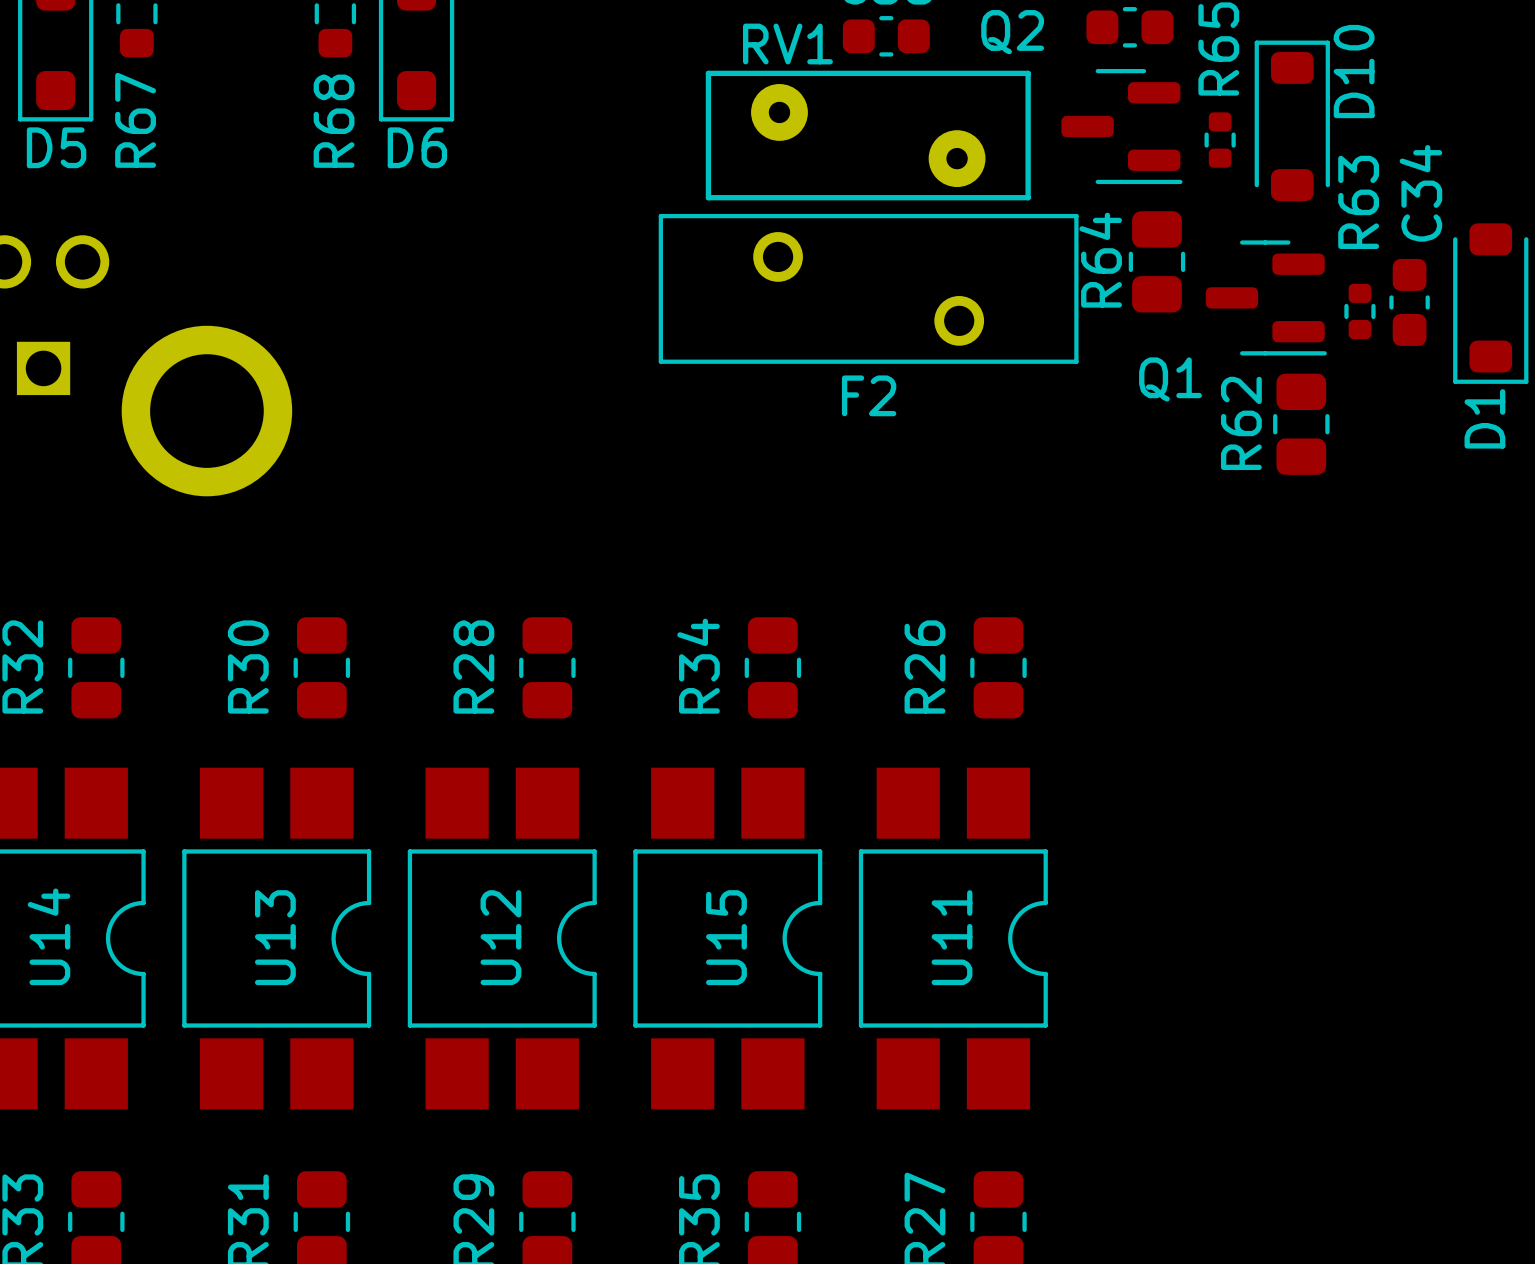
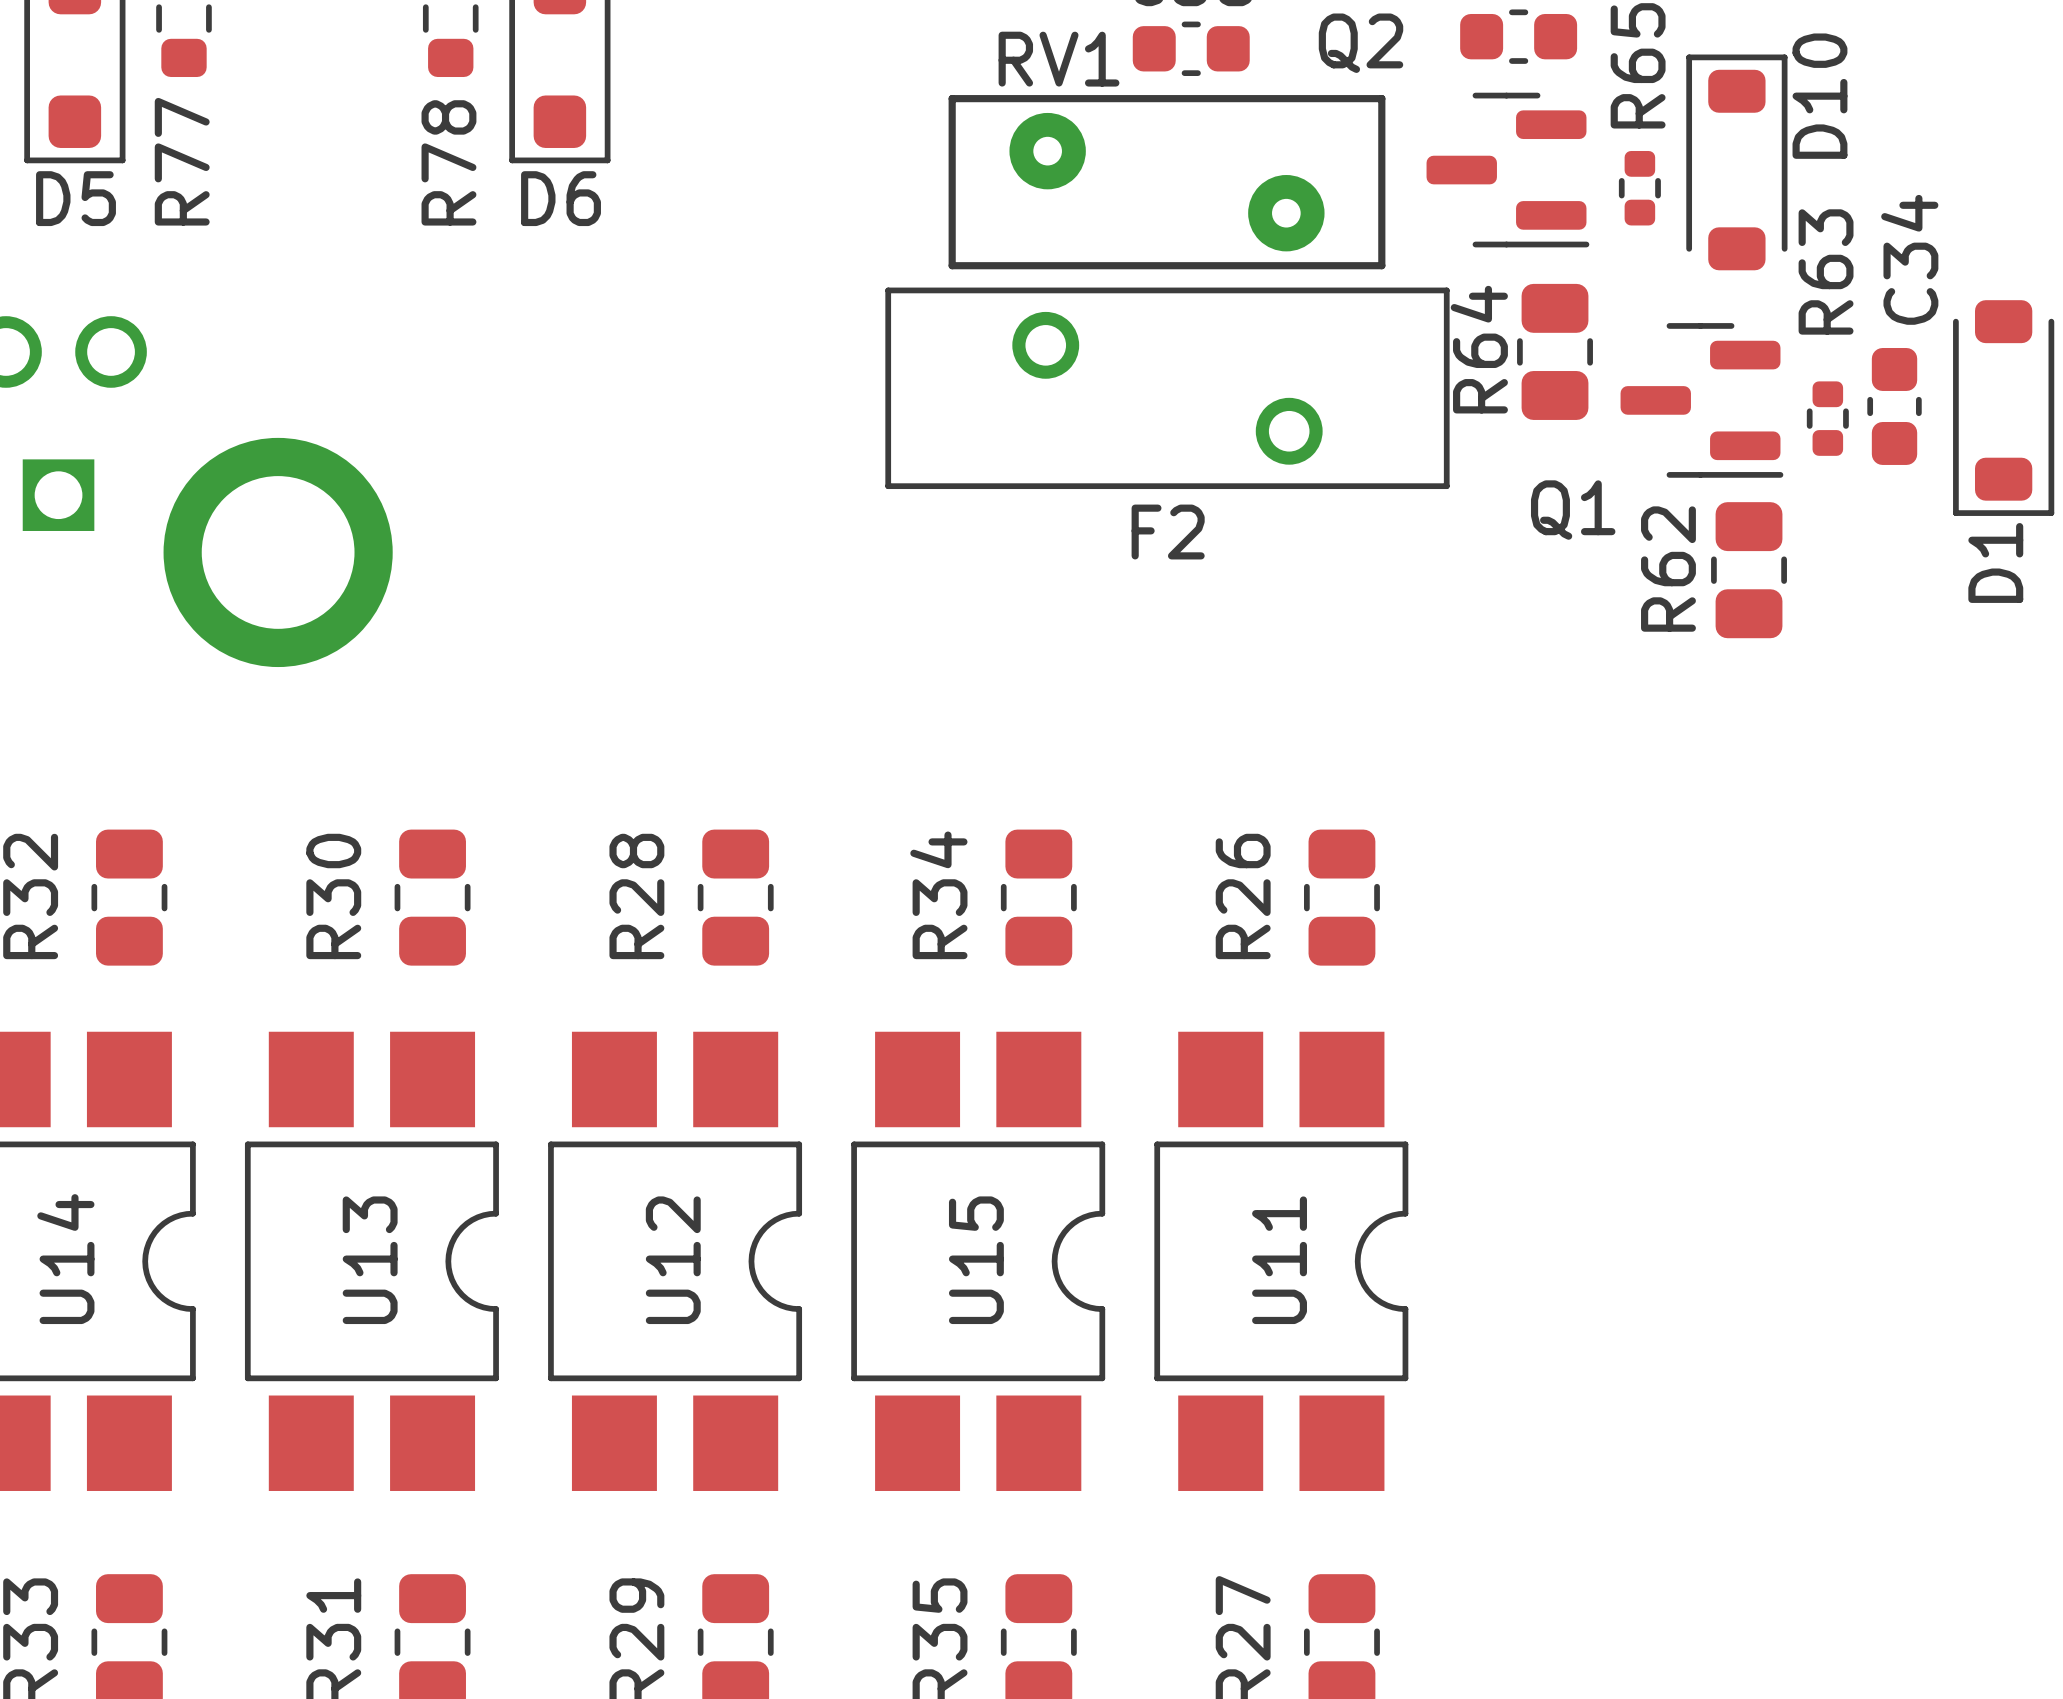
R67 name: R67 (135, 120) -> R77 (182, 161)
R68 name: R68 (334, 121) -> R78 (448, 162)

